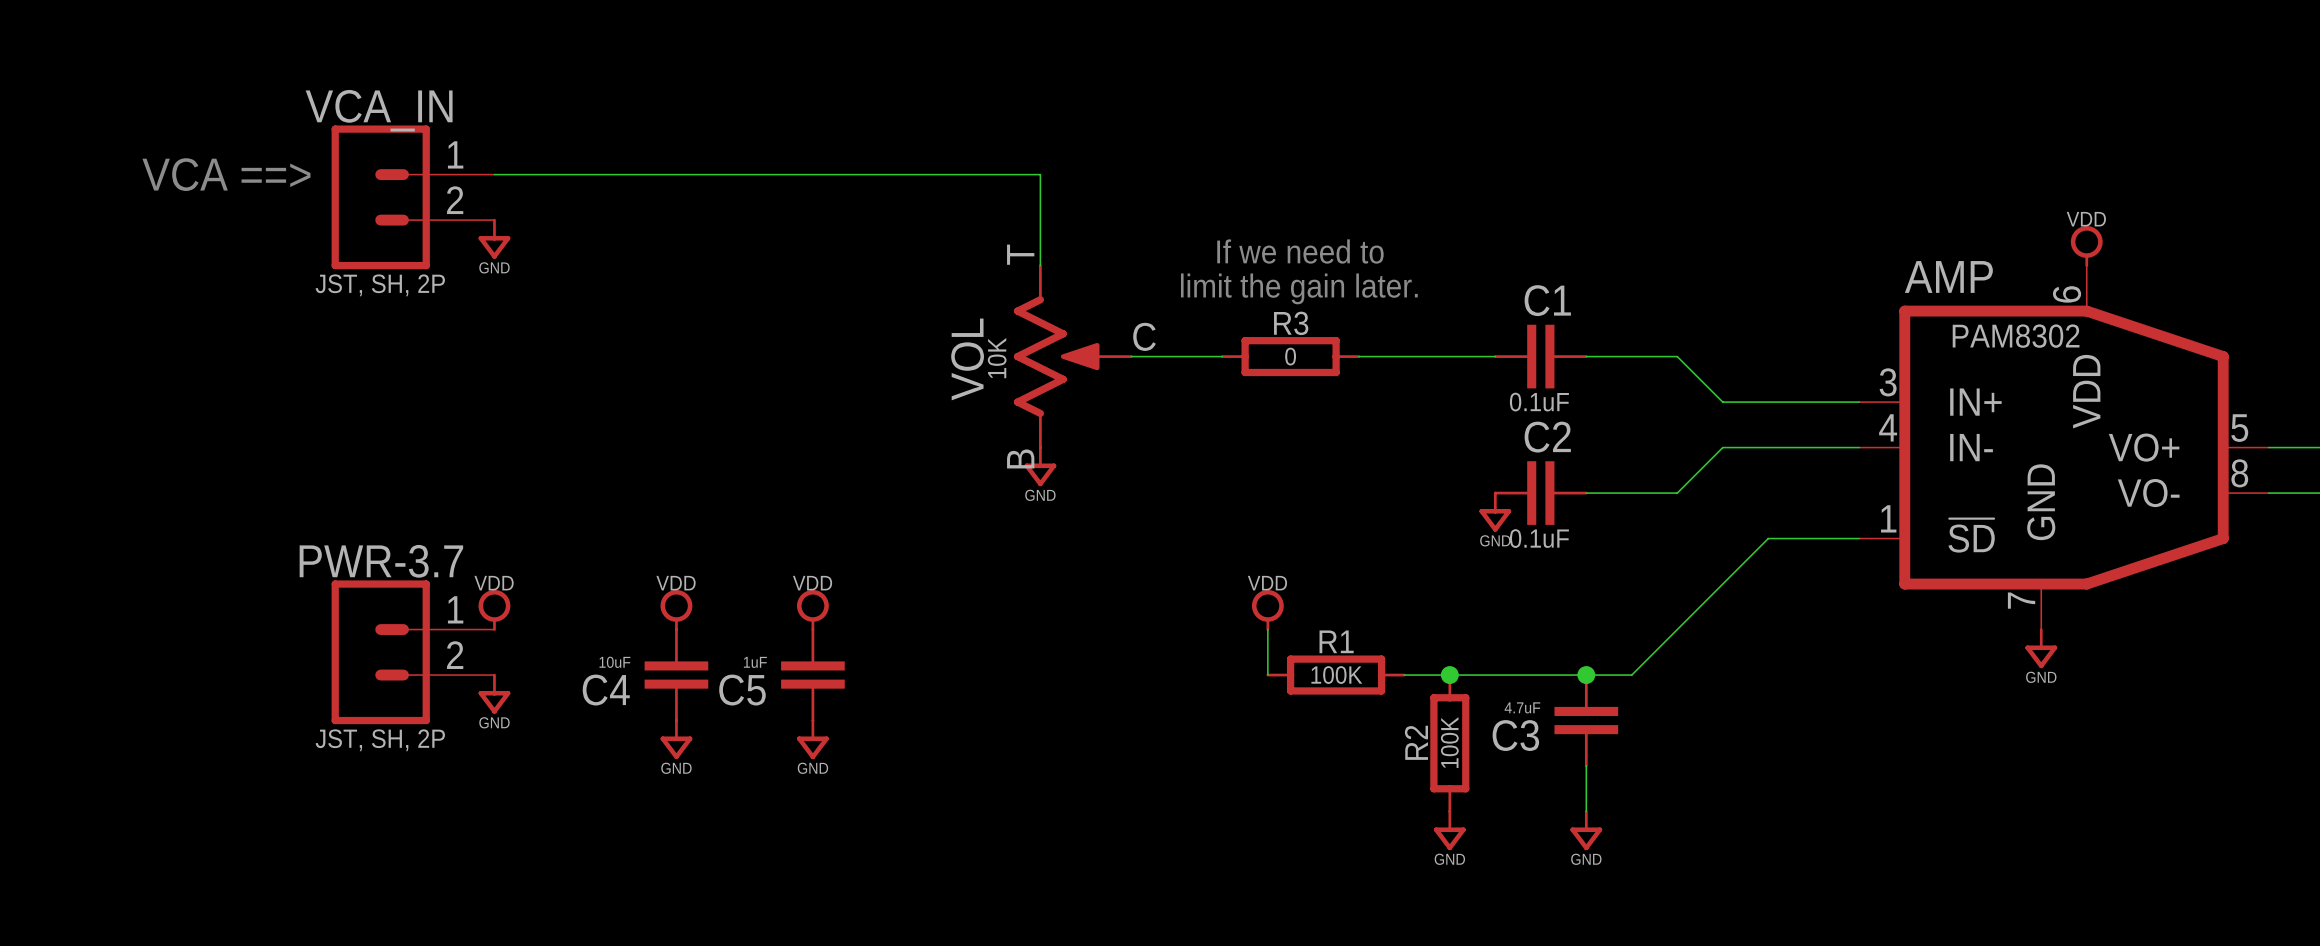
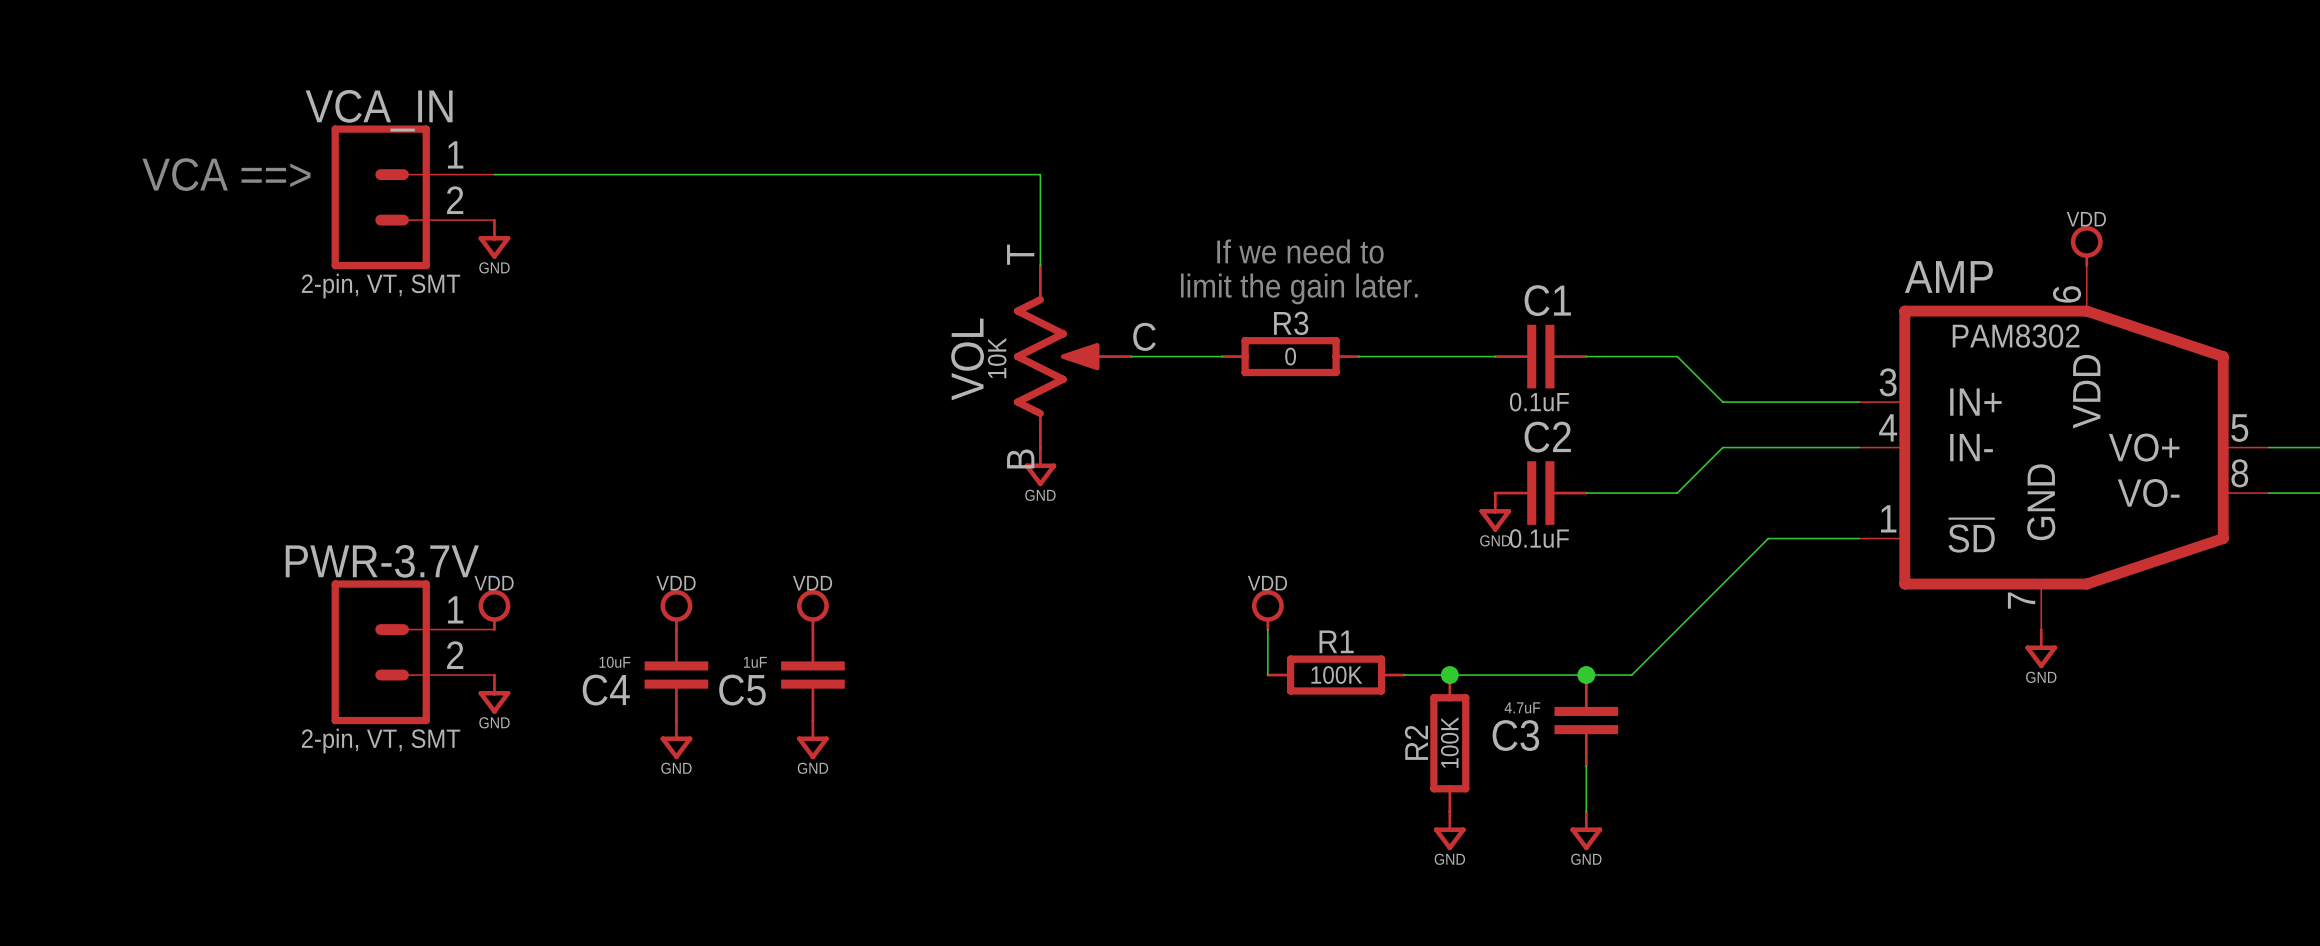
VCA_IN value: JST, SH, 2P (380, 285) -> 2-pin, VT, SMT (381, 286)
PWR-3.7 name: PWR-3.7 (381, 561) -> PWR-3.7V (382, 561)
PWR-3.7 value: JST, SH, 2P (380, 740) -> 2-pin, VT, SMT (381, 740)

